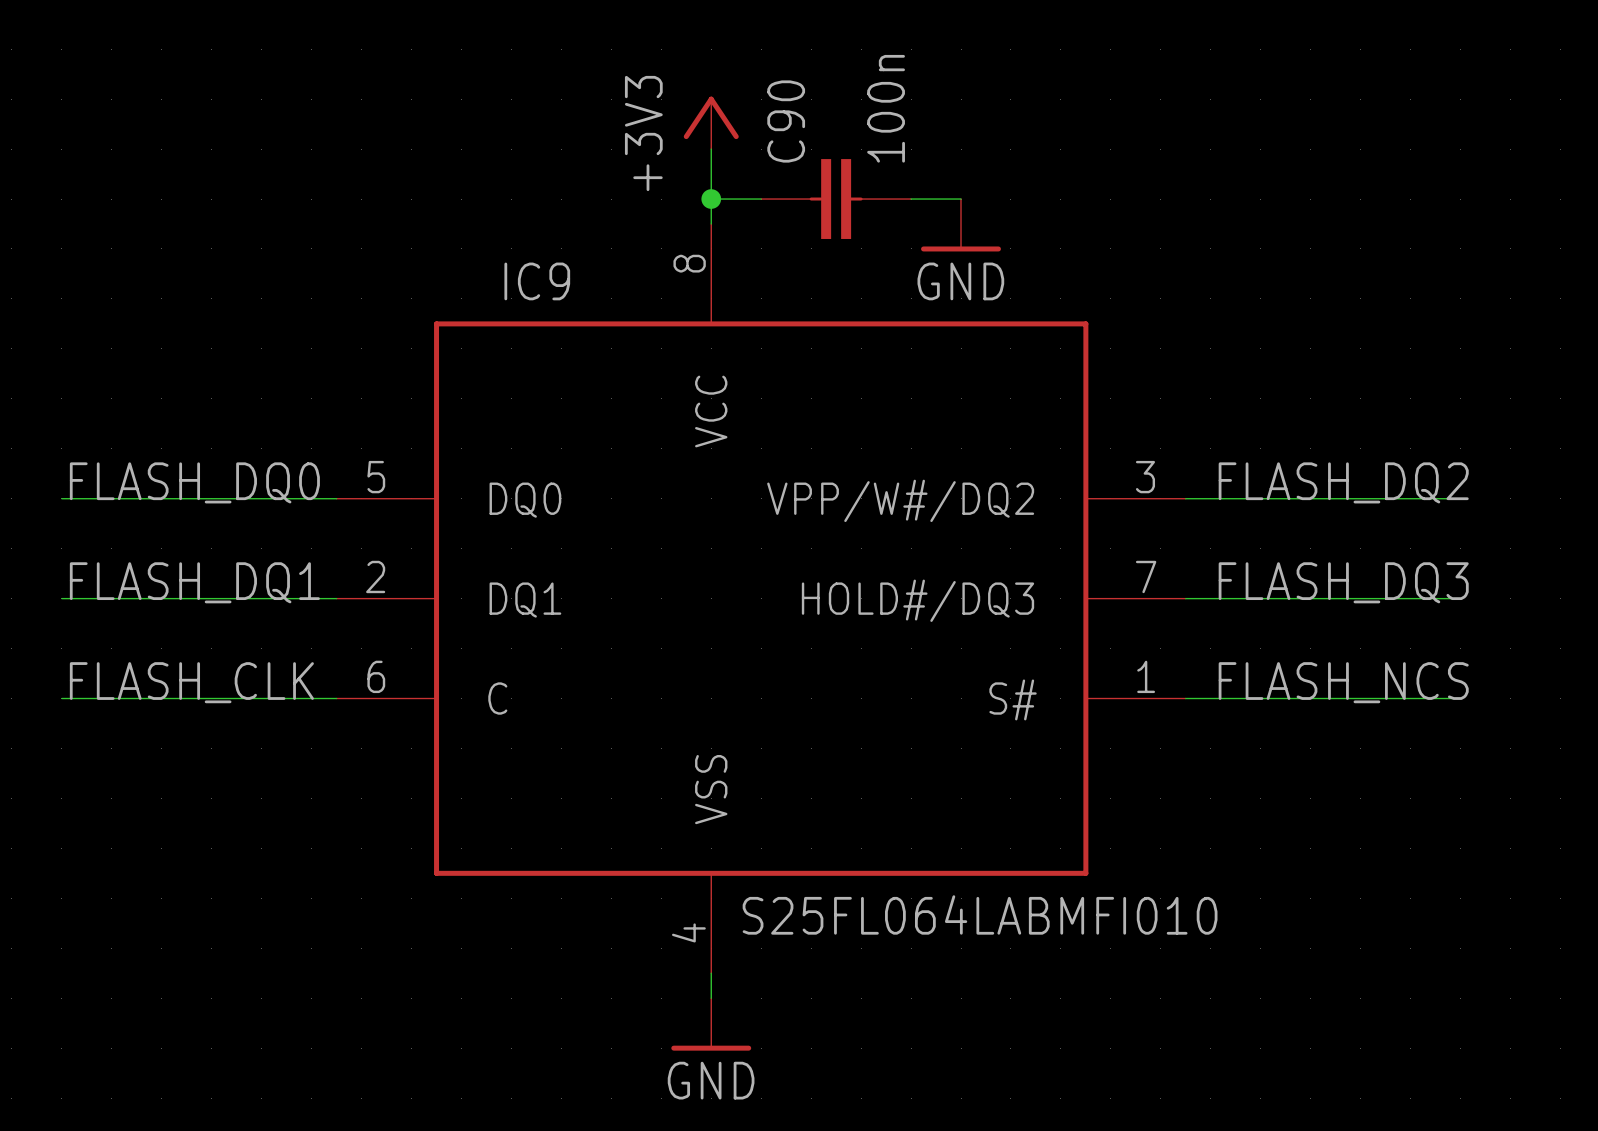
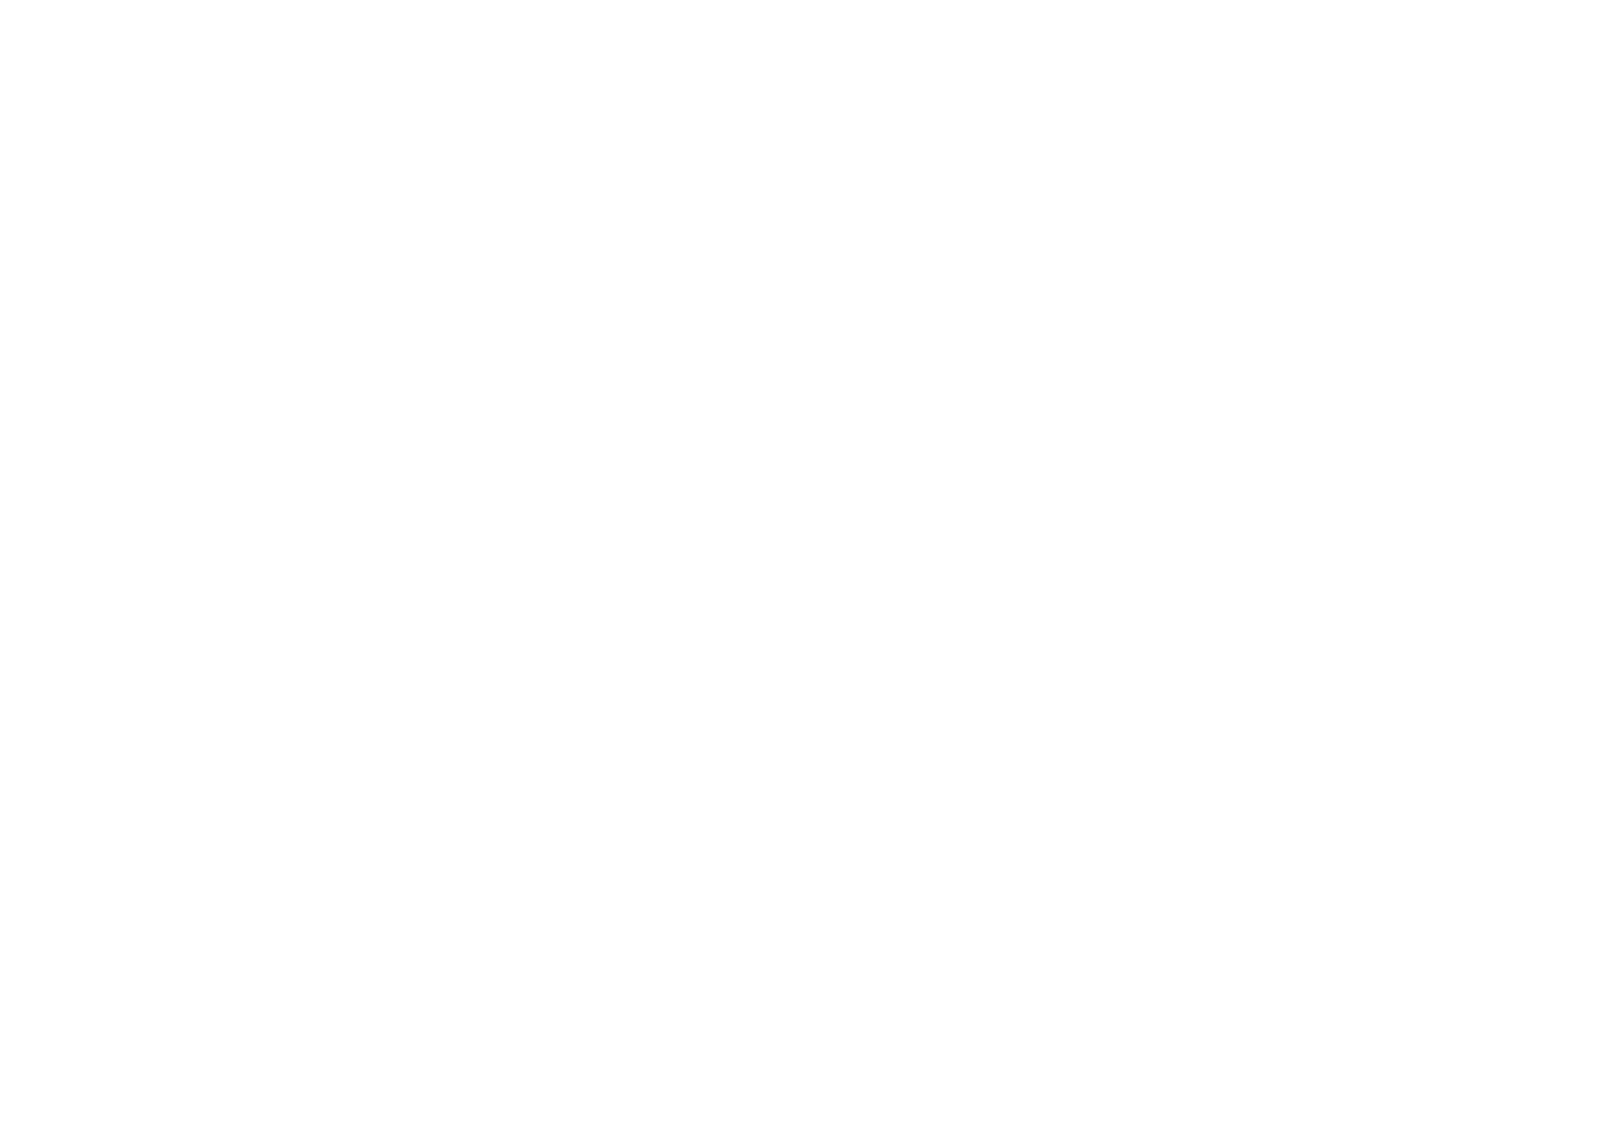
power symbol: +3V3 (711, 122) -> none
wire: (711, 149) (711, 224) -> none
wire: (711, 199) (761, 199) -> none
junction: (711, 199) -> none
C90: 100n (836, 199) -> none
wire: (911, 199) (961, 199) -> none
power symbol: GND (961, 225) -> none
label: FLASH_DQ0 (194, 482) -> none
label: FLASH_DQ2 (1343, 482) -> none
wire: (61, 498) (336, 498) -> none
wire: (1185, 498) (1460, 498) -> none
label: FLASH_DQ1 (194, 582) -> none
label: FLASH_DQ3 (1343, 582) -> none
wire: (61, 598) (336, 598) -> none
IC9: S25FL064LABMFI010 (761, 598) -> none
wire: (1185, 598) (1460, 598) -> none
label: FLASH_CLK (191, 682) -> none
label: FLASH_NCS (1343, 682) -> none
wire: (61, 698) (336, 698) -> none
wire: (1185, 698) (1460, 698) -> none
wire: (711, 973) (711, 998) -> none
power symbol: GND (711, 1024) -> none

